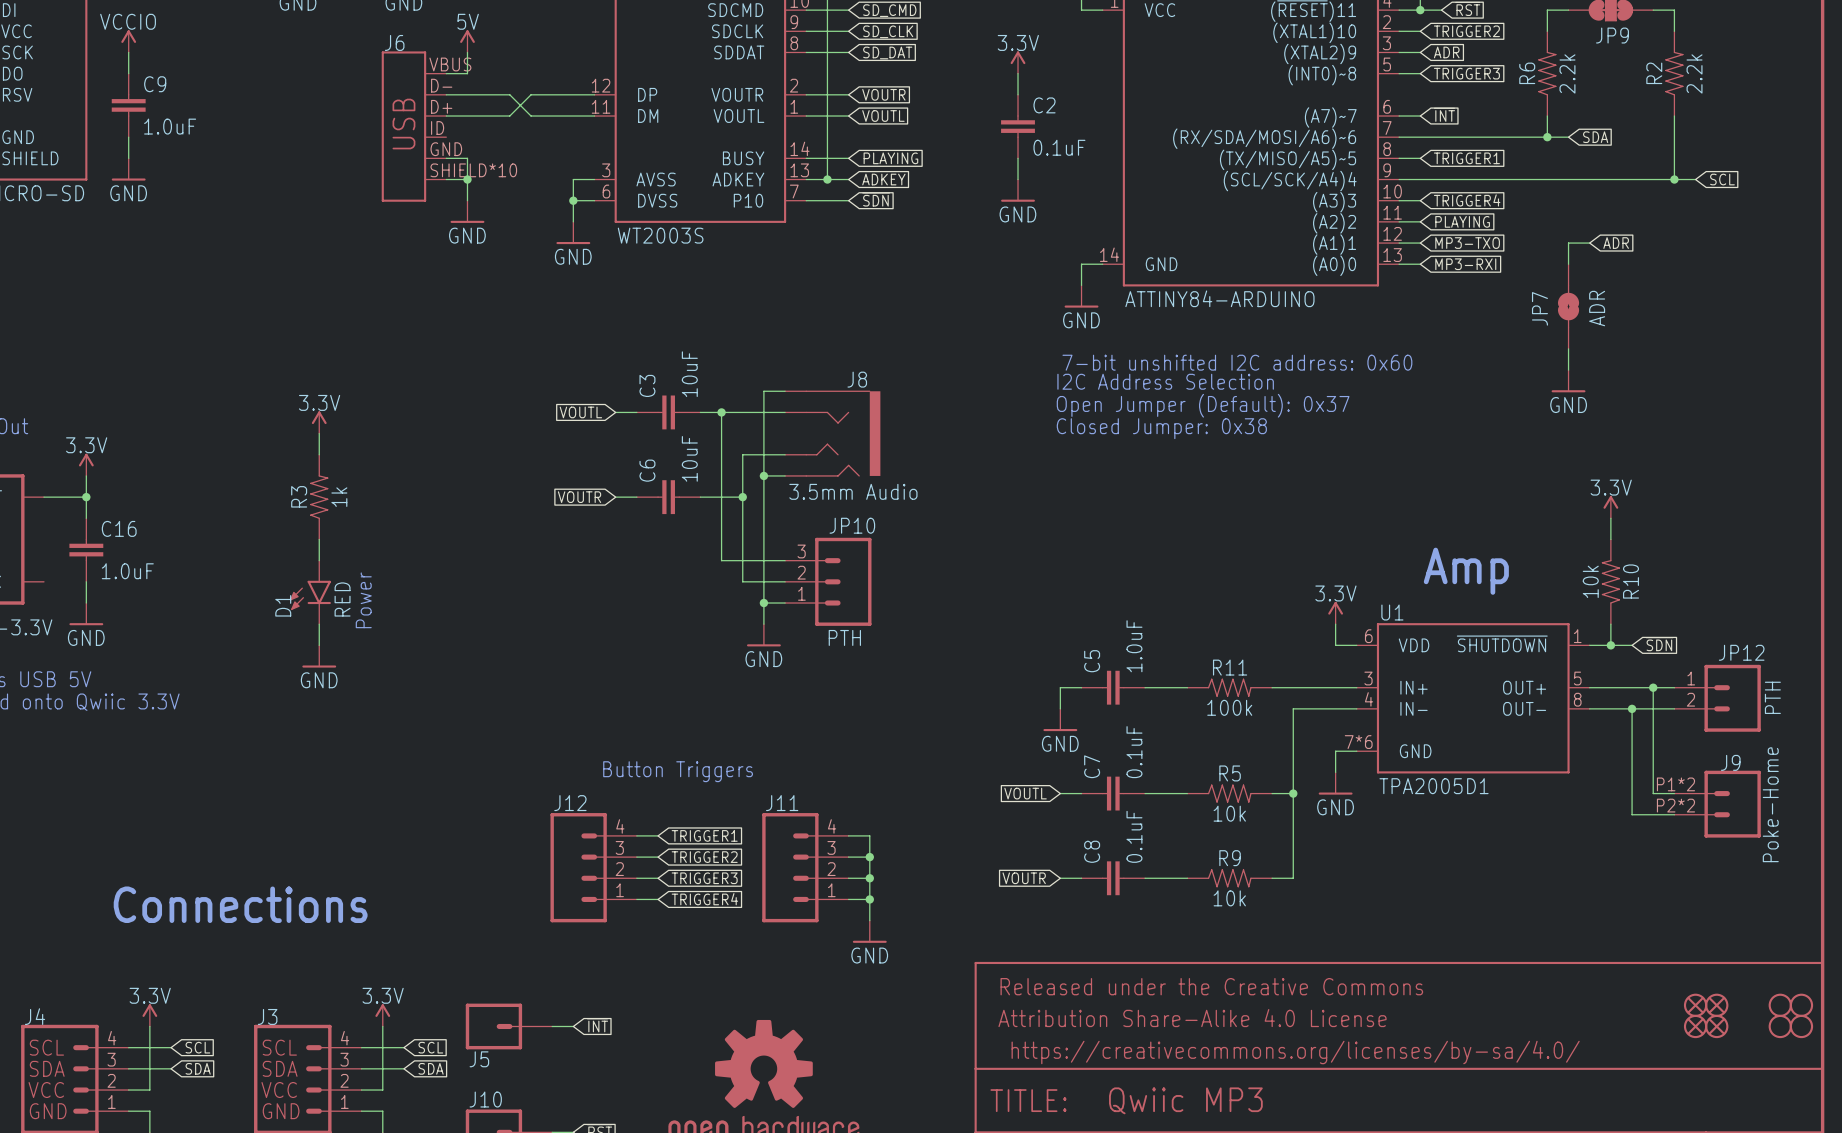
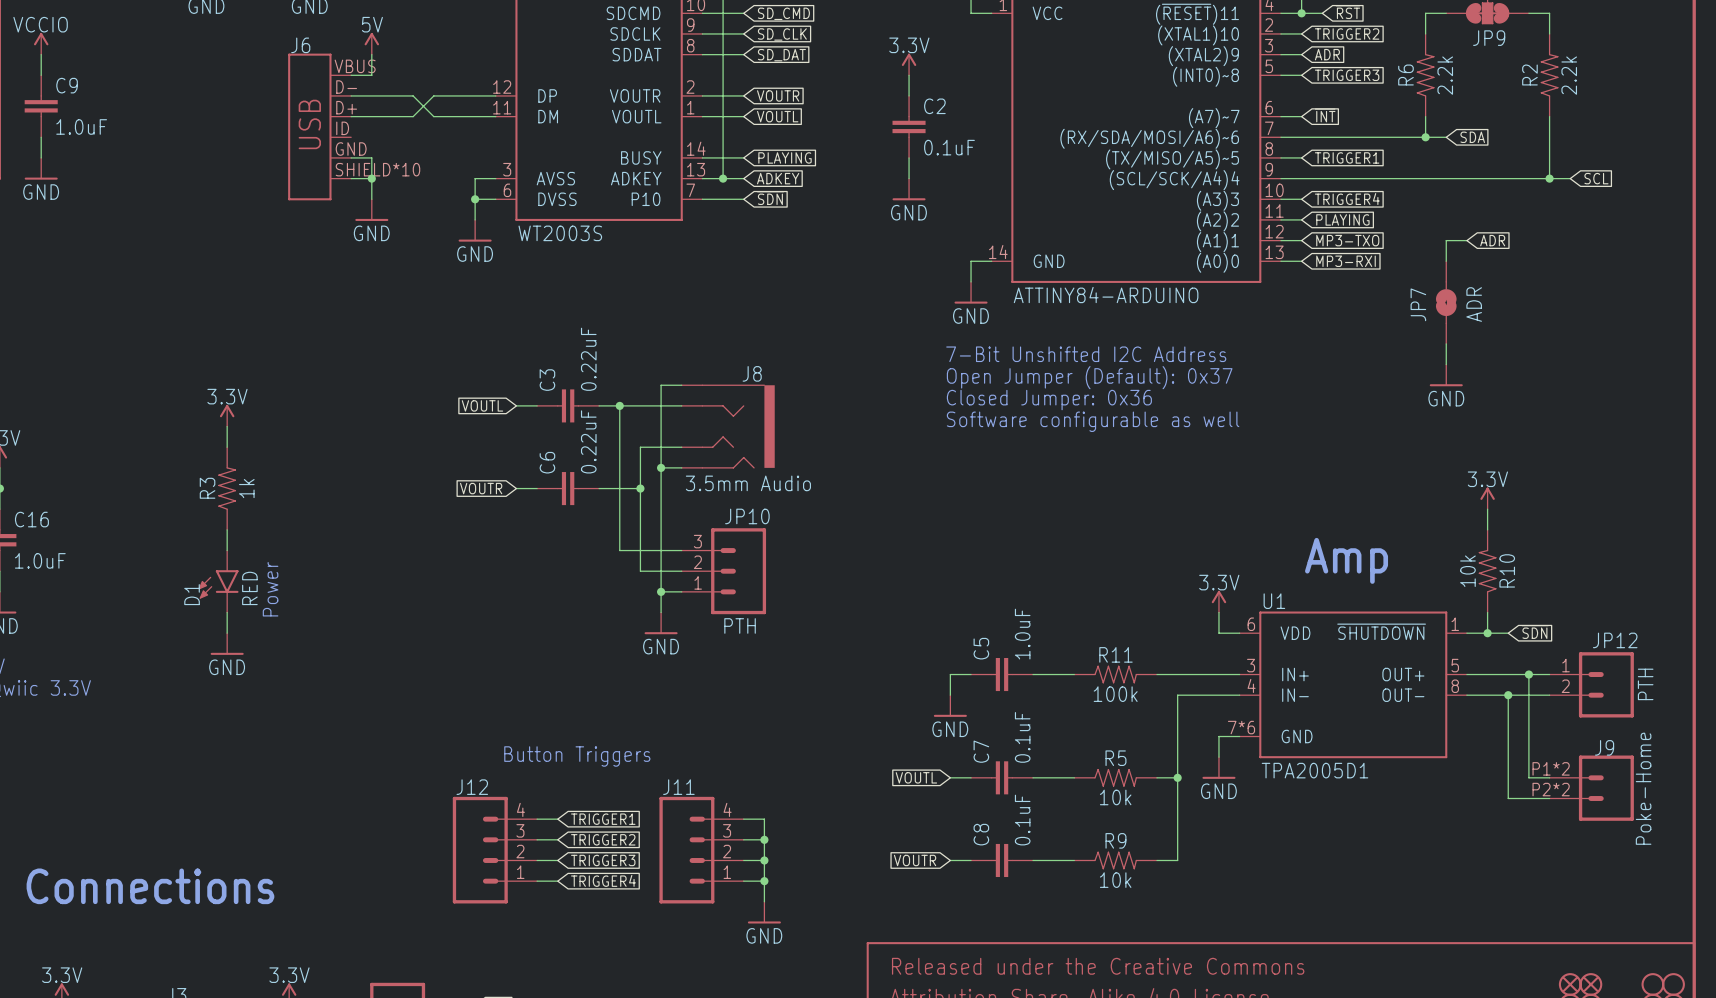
text: 7-bit unshifted I2C address: 0x60 (1237, 362) -> 7-Bit Unshifted I2C Address (1086, 354)
C3 value: 10uF (689, 374) -> 0.22uF (588, 359)
text: I2C Address Selection (1165, 381) -> Open Jumper (Default): 0x37 (1089, 377)
text: Open Jumper (Default): 0x37 (1203, 405) -> Closed Jumper: 0x36 (1049, 400)
text: Closed Jumper: 0x38 (1161, 428) -> Software configurable as well (1093, 421)
C6 value: 10uF (689, 458) -> 0.22uF (588, 441)

